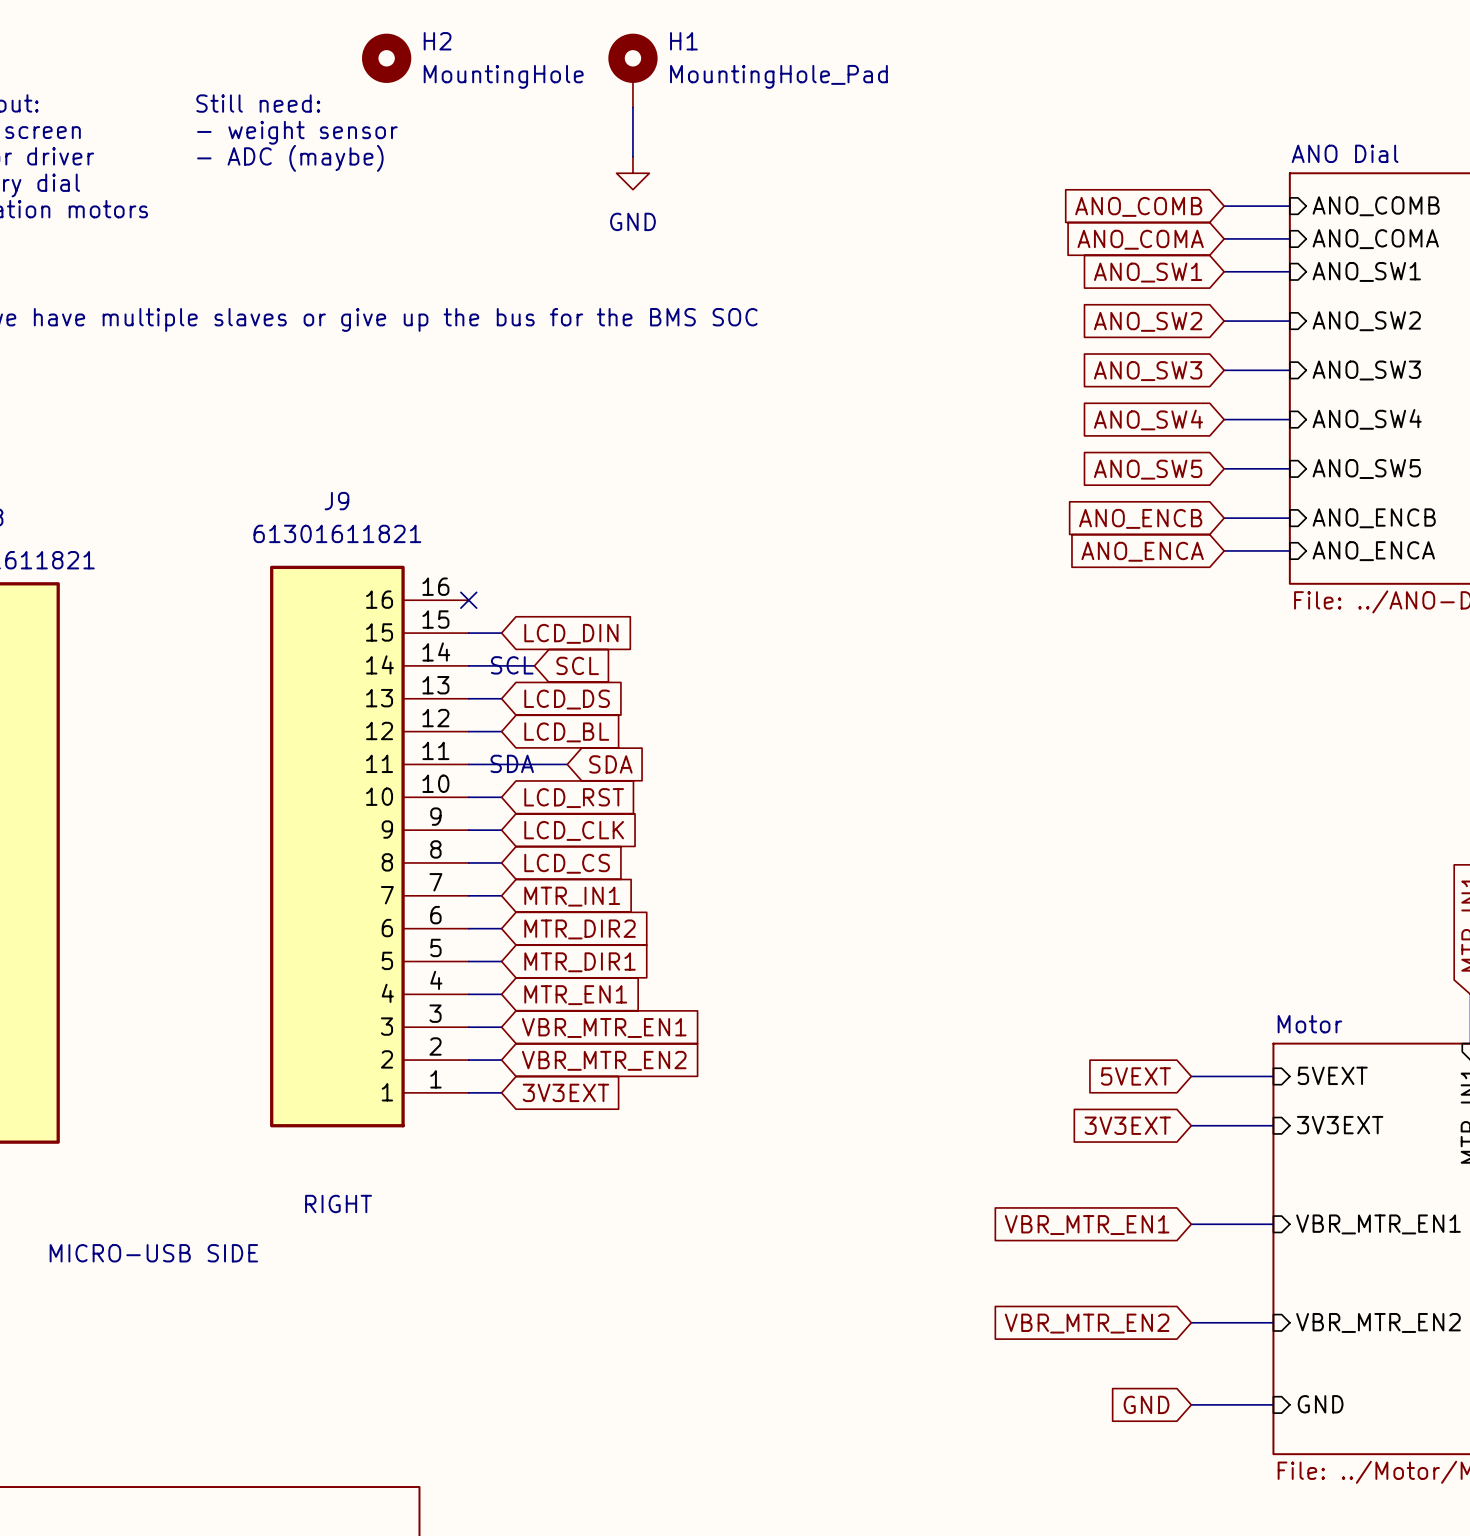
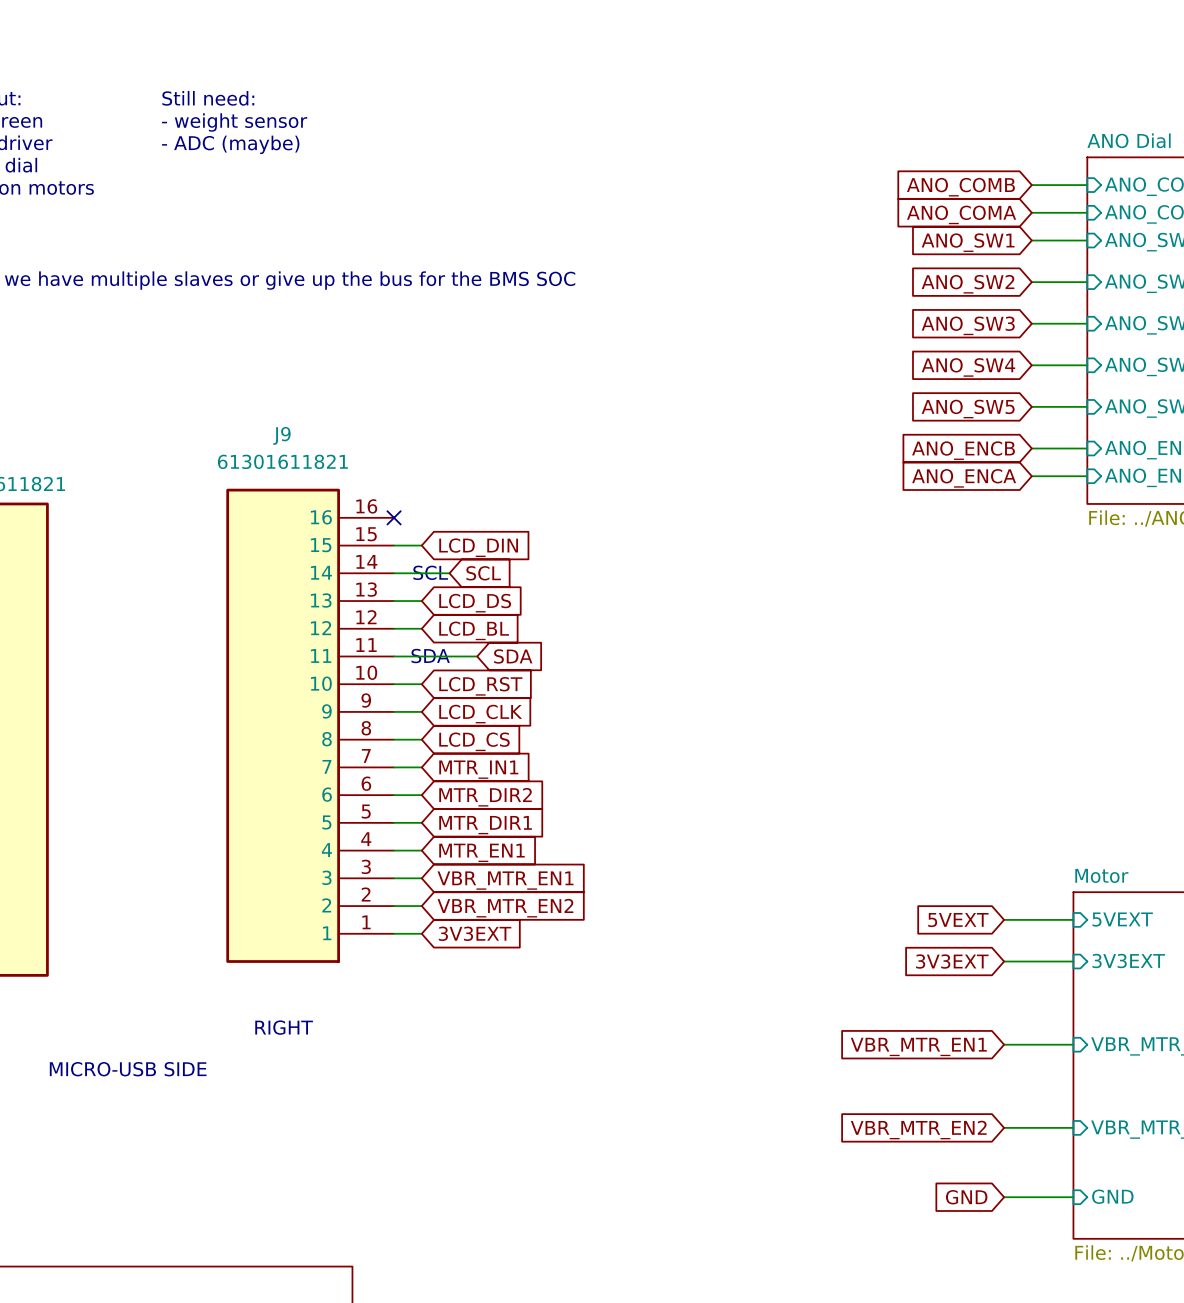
H2: MountingHole (386, 58) -> none
H1: MountingHole_Pad (632, 70) -> none
wire: (632, 107) (632, 156) -> none
power symbol: GND (632, 173) -> none

